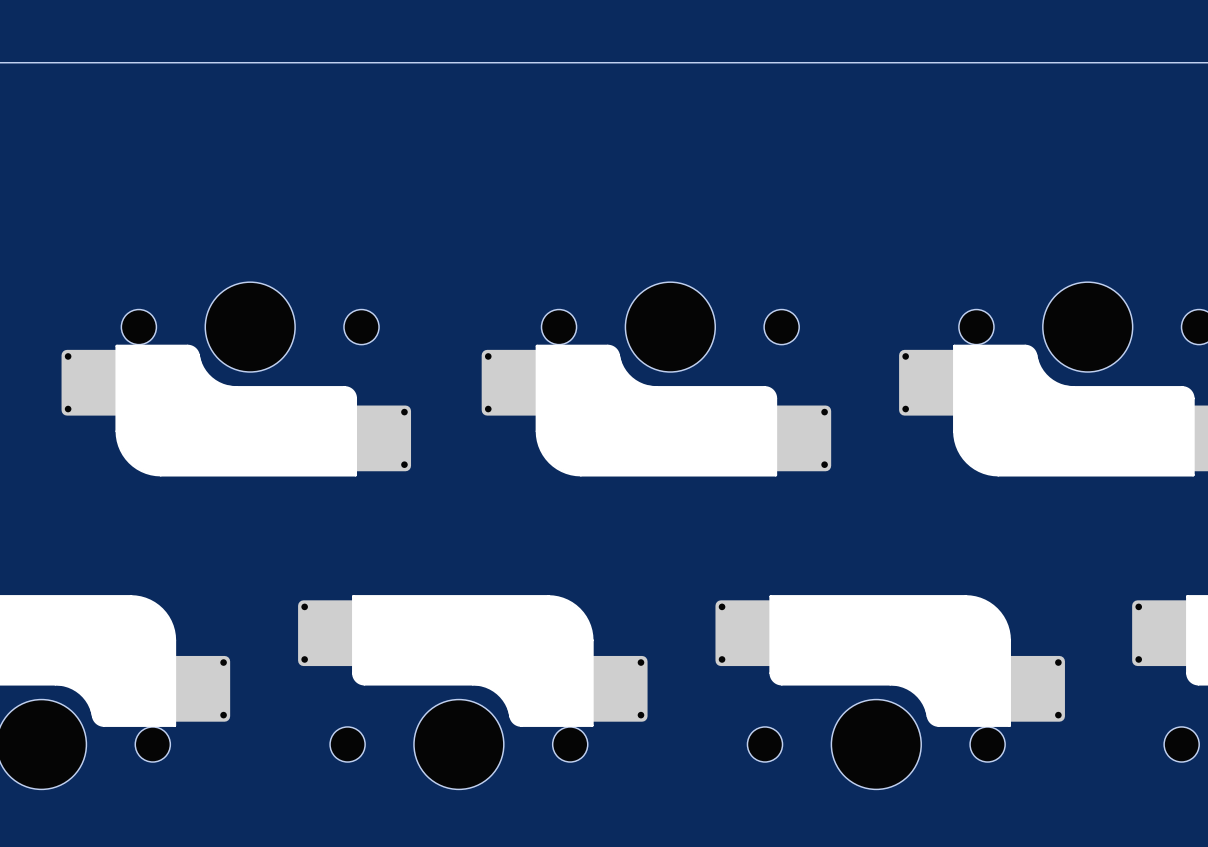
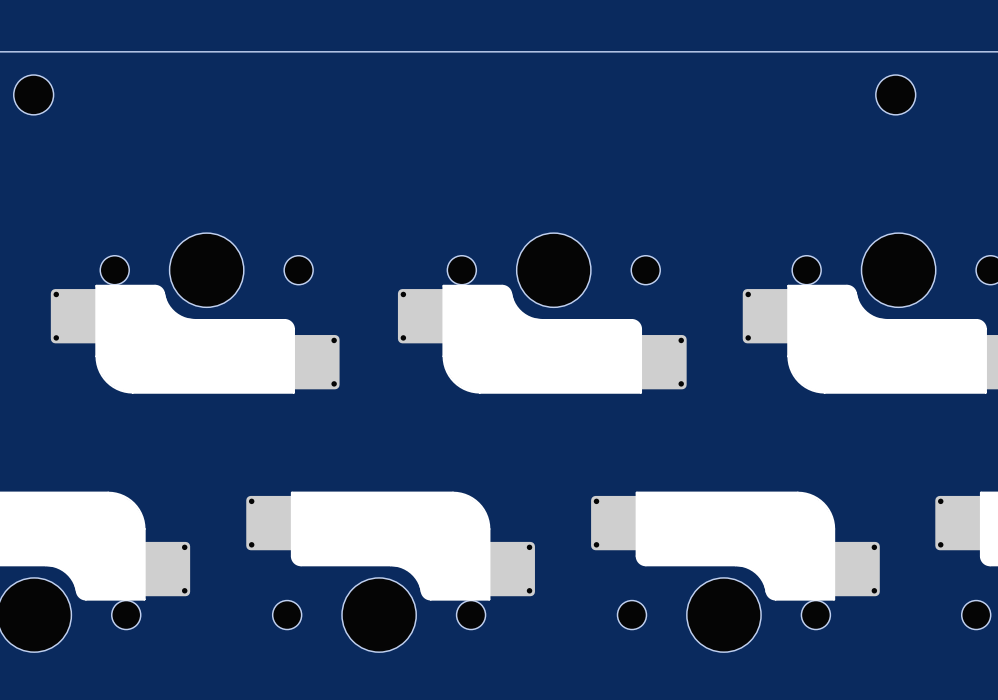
part: none -> (33, 94)
part: none -> (895, 94)

